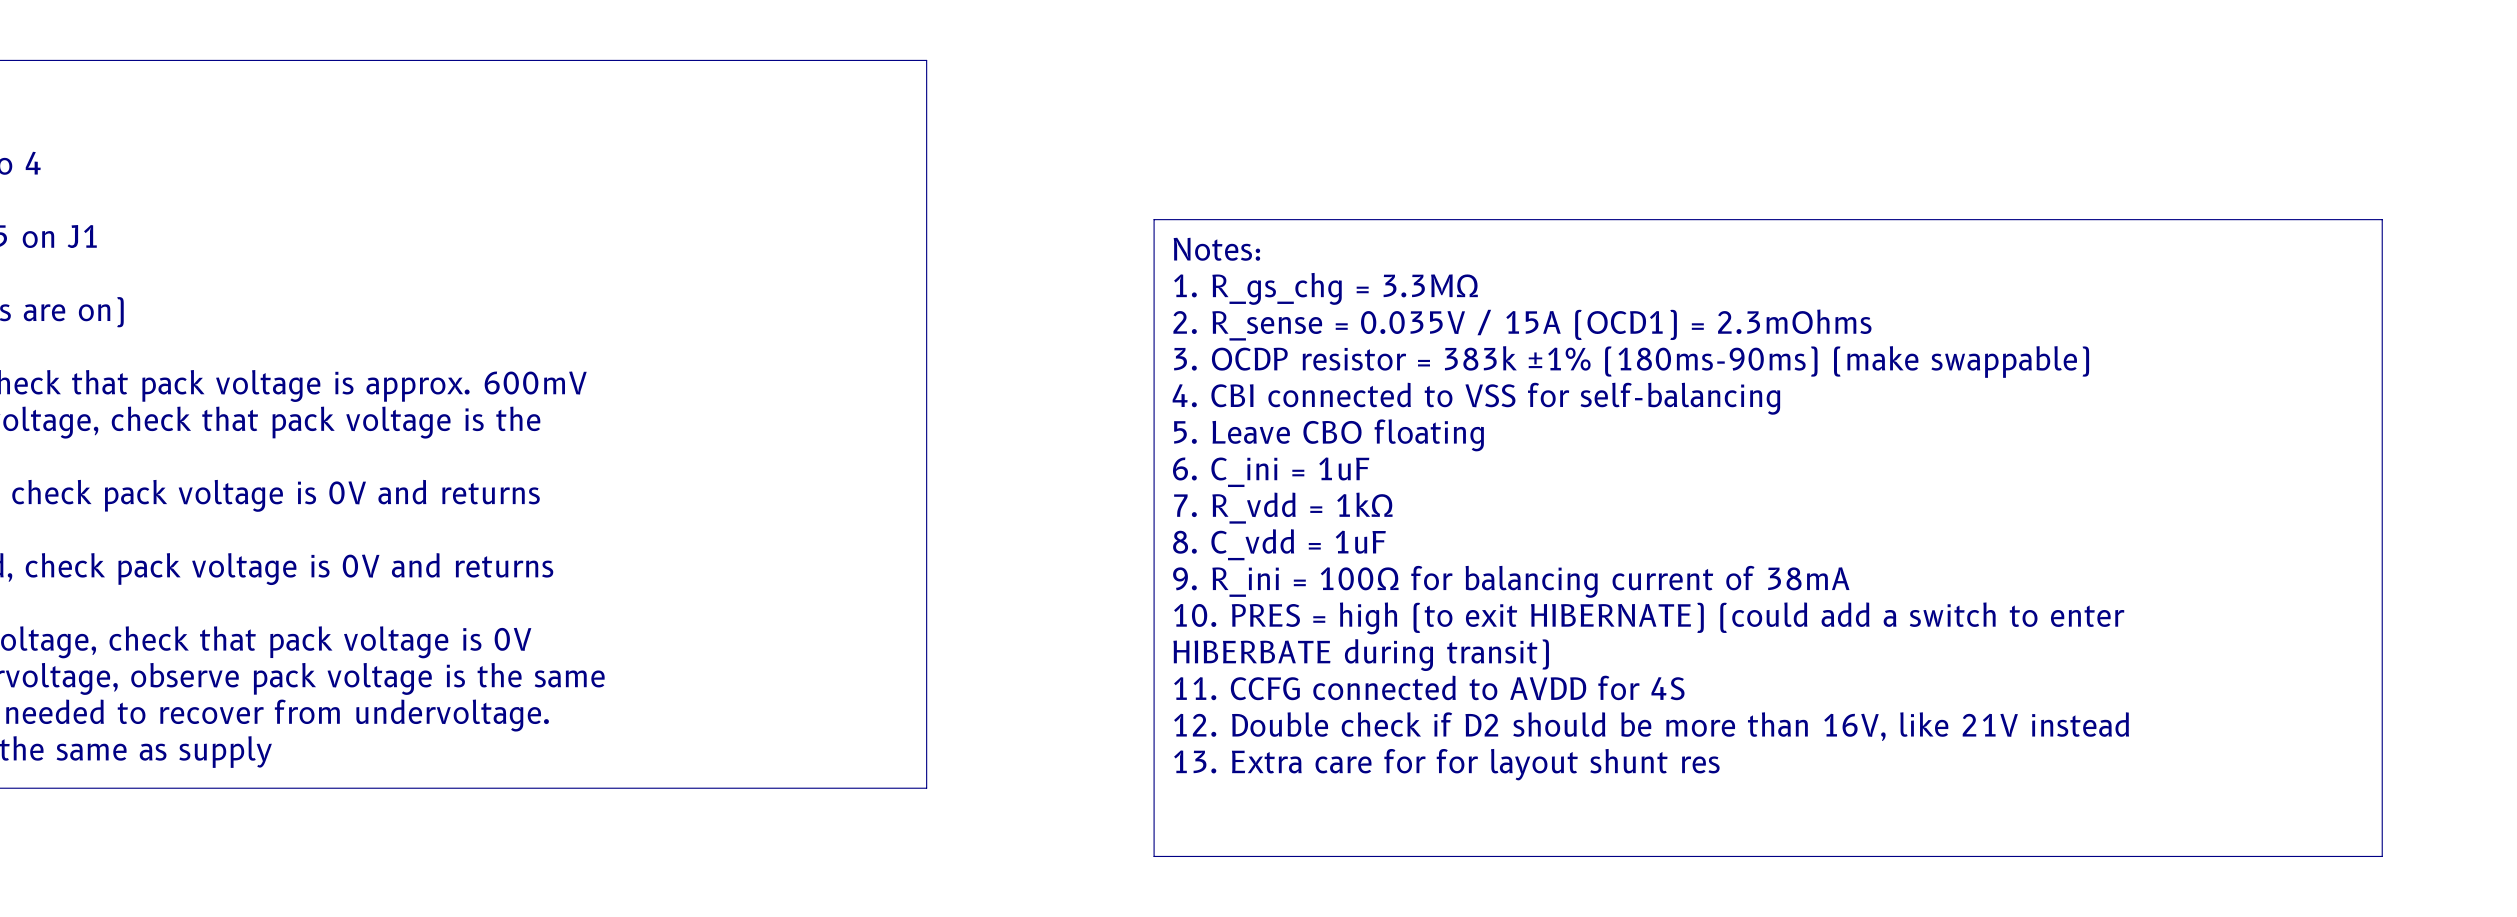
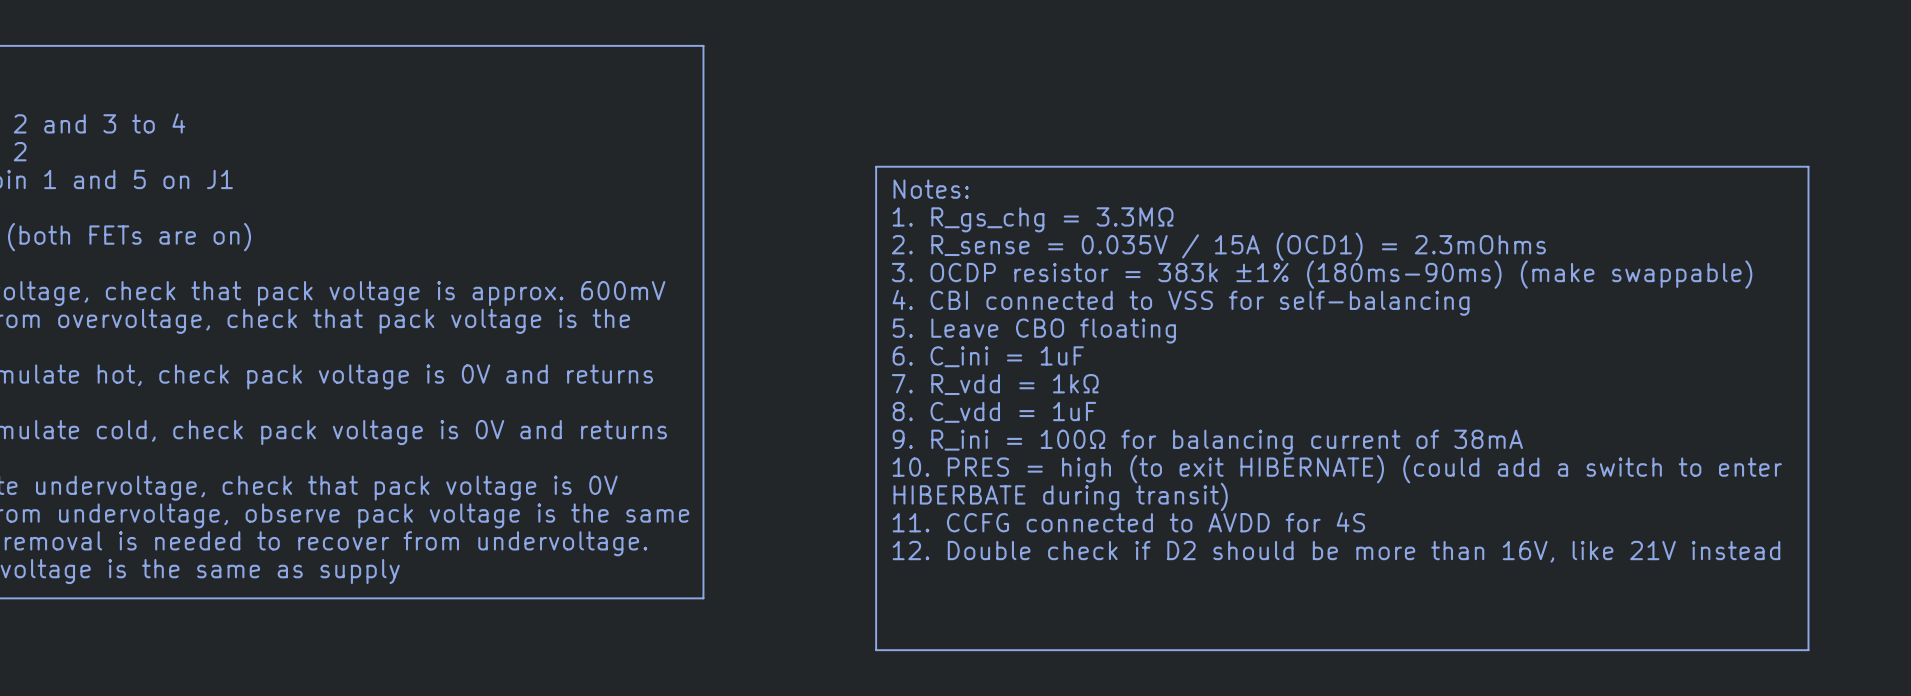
text: 13. Extra care for for layout shunt res (1446, 764) -> none

